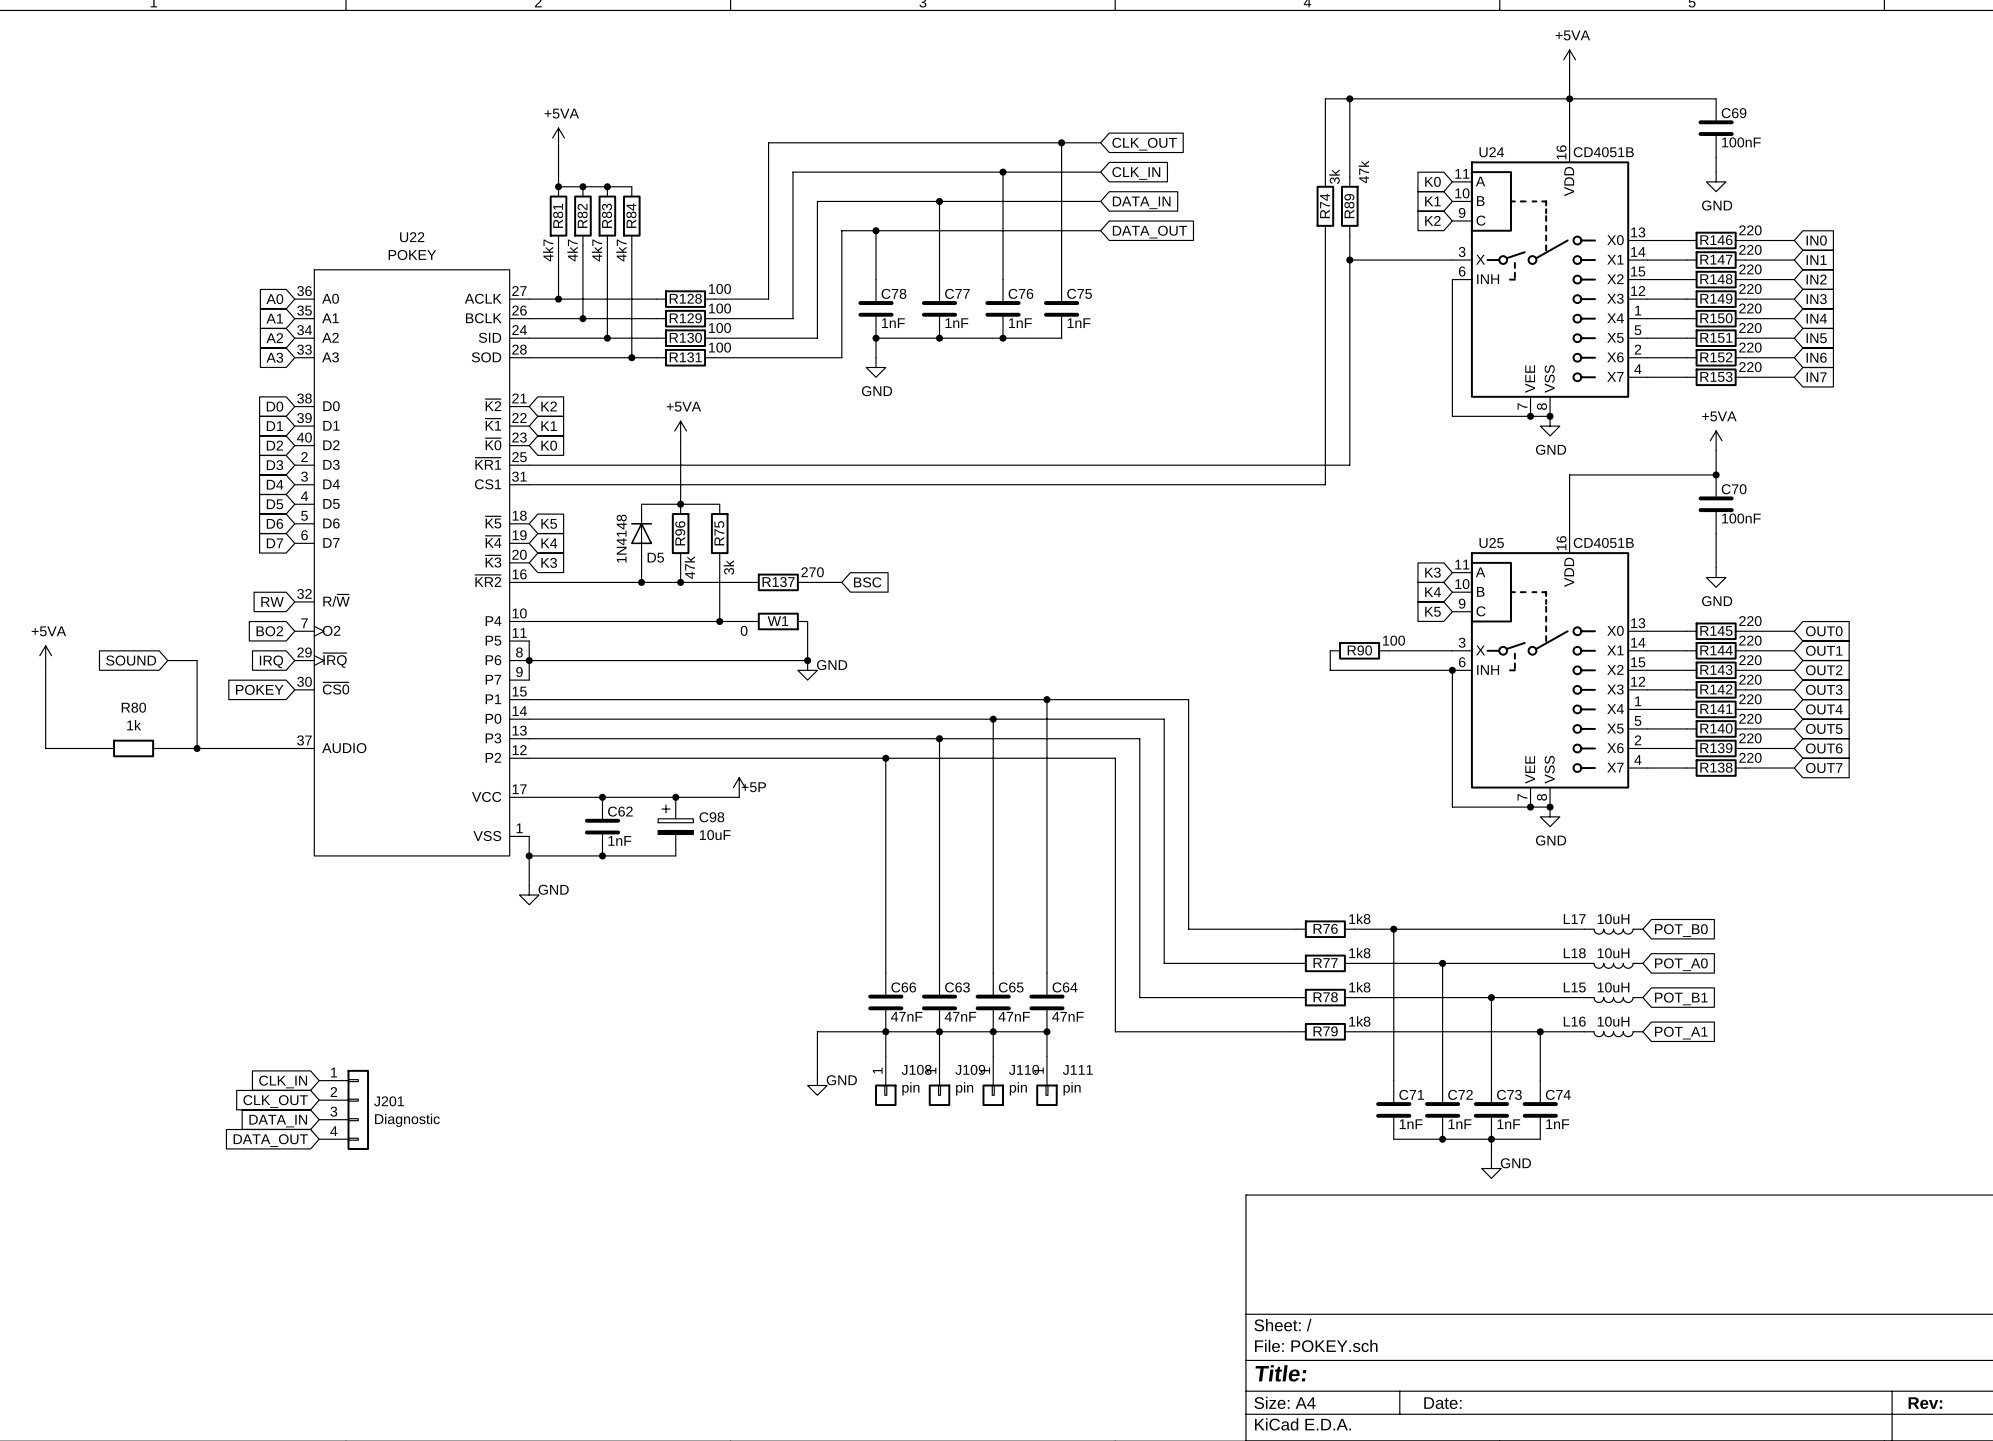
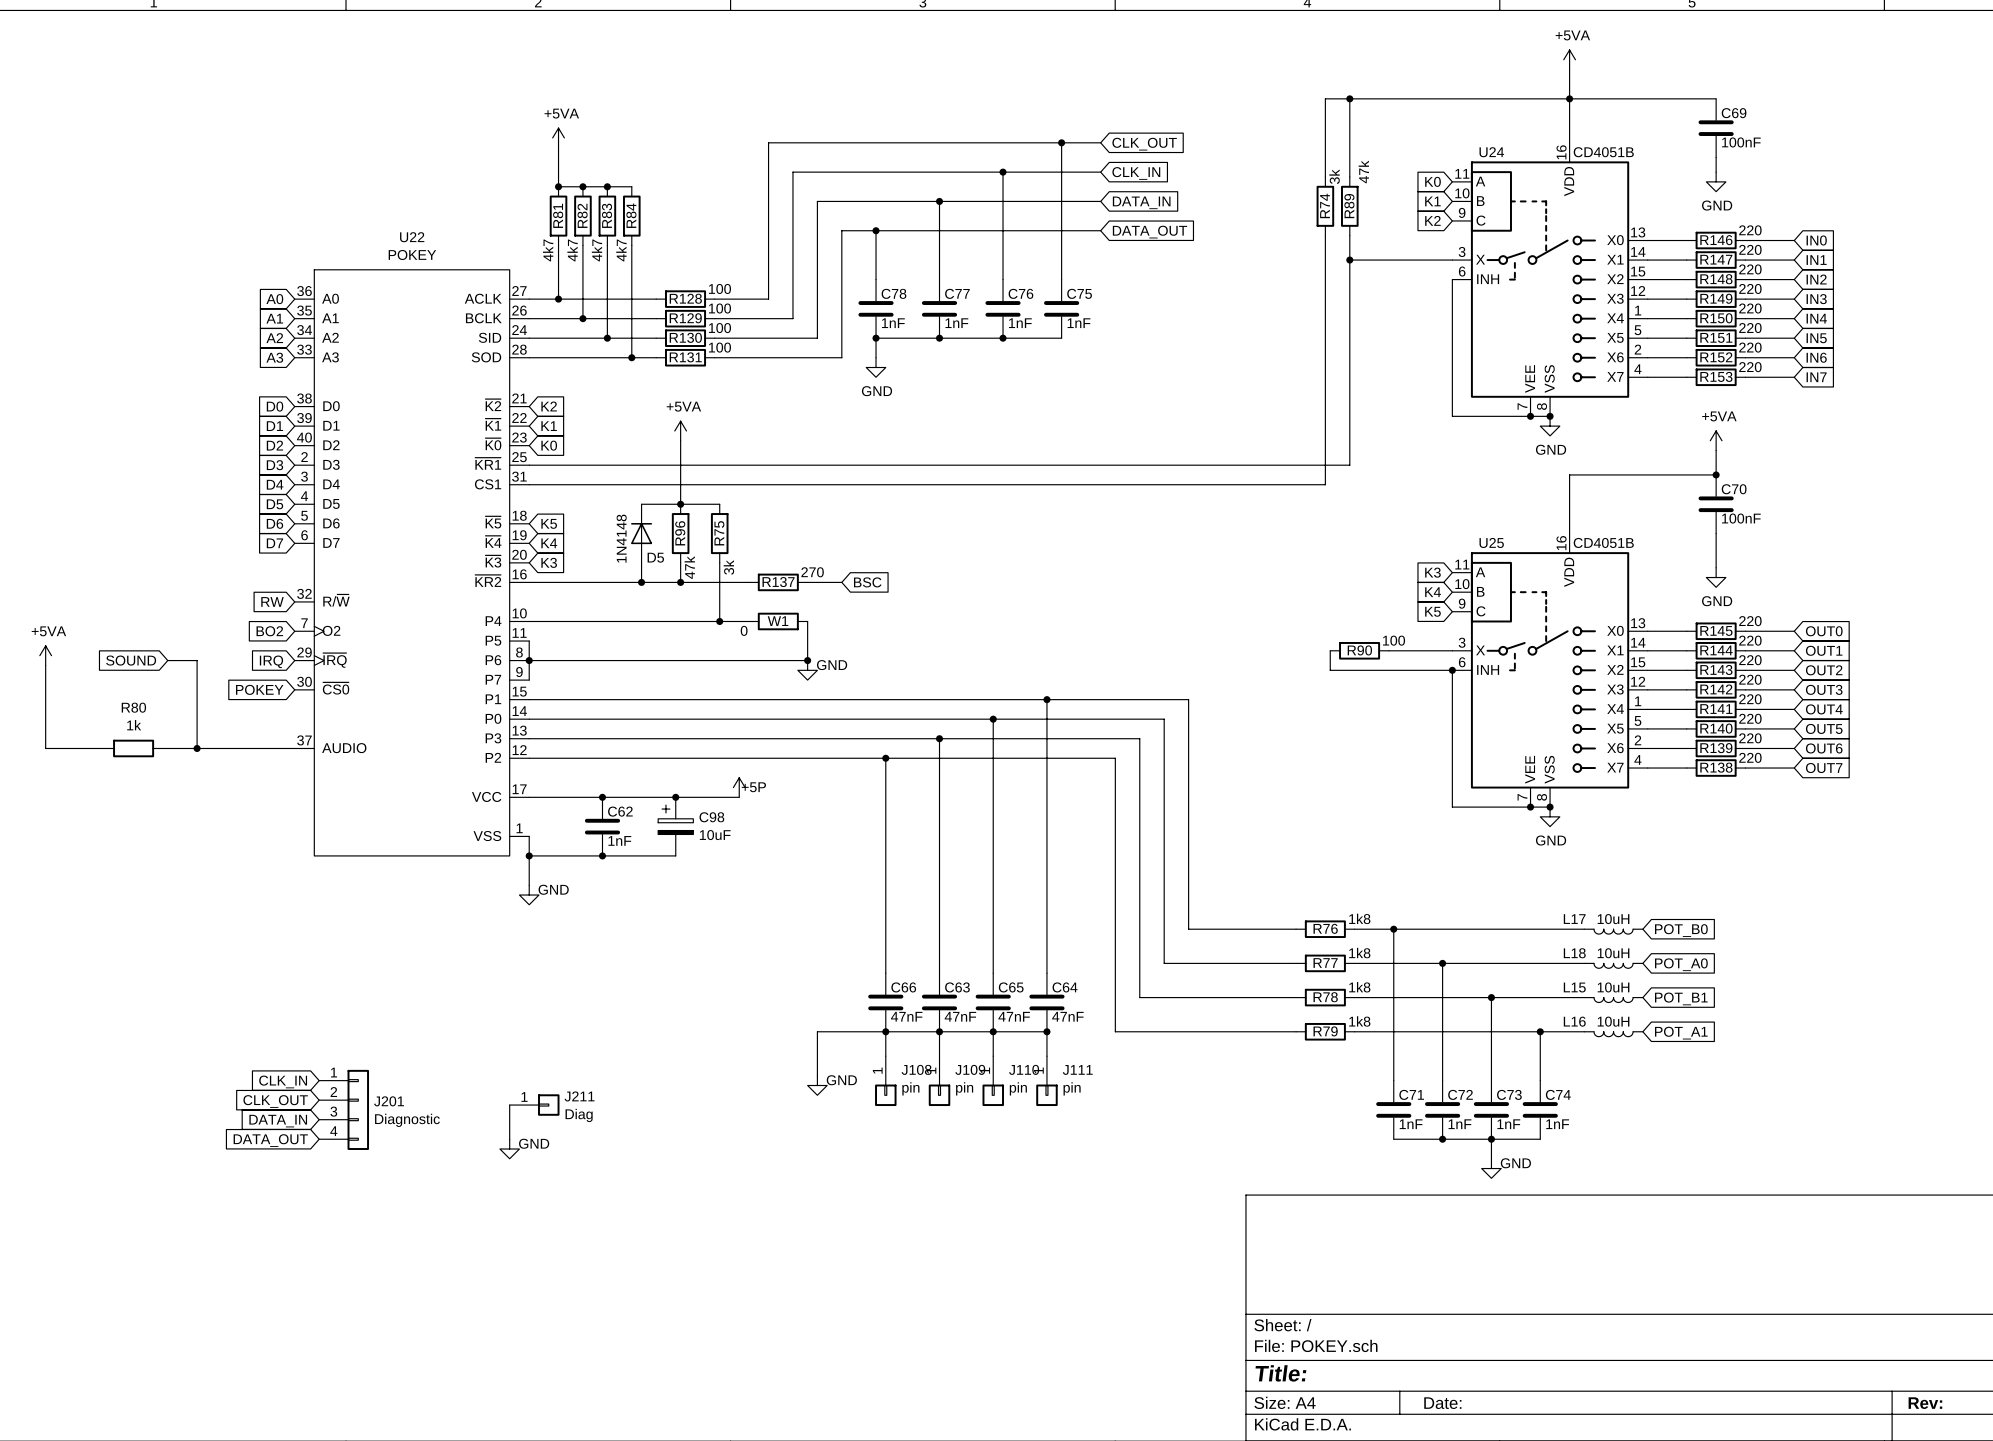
wire: none -> (509, 1105) (509, 1139)
J211: none -> Diag (534, 1105)
power symbol: none -> GND (509, 1149)

